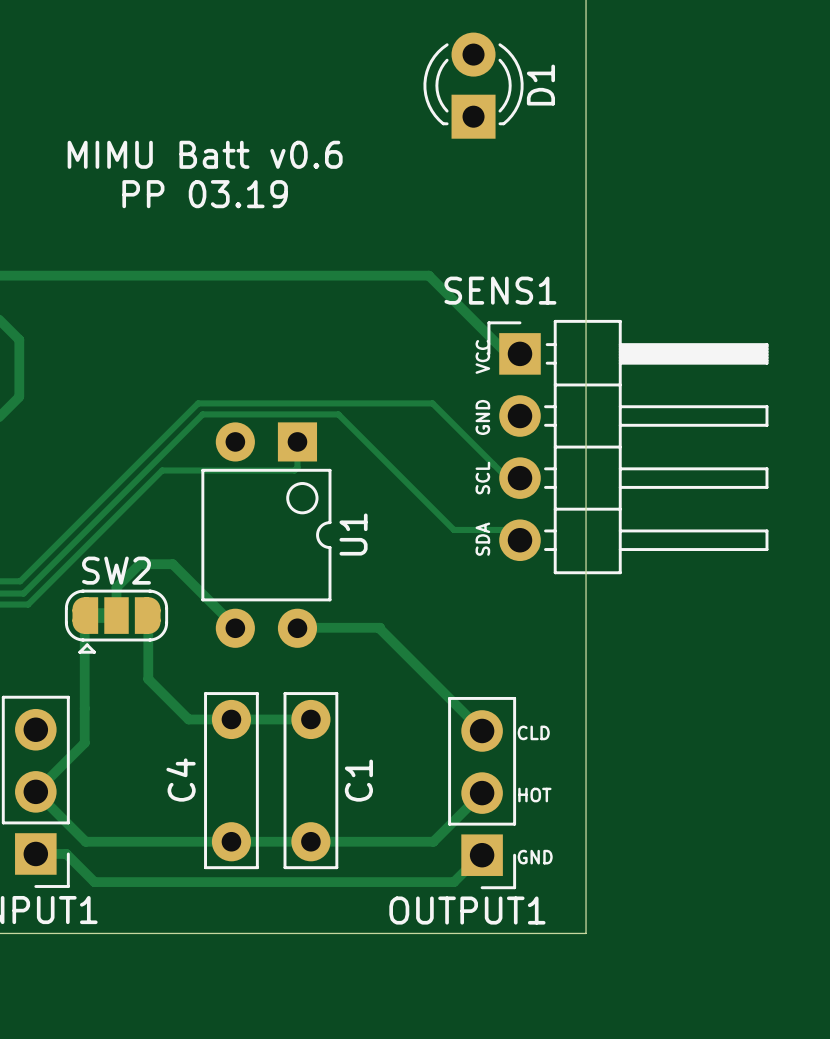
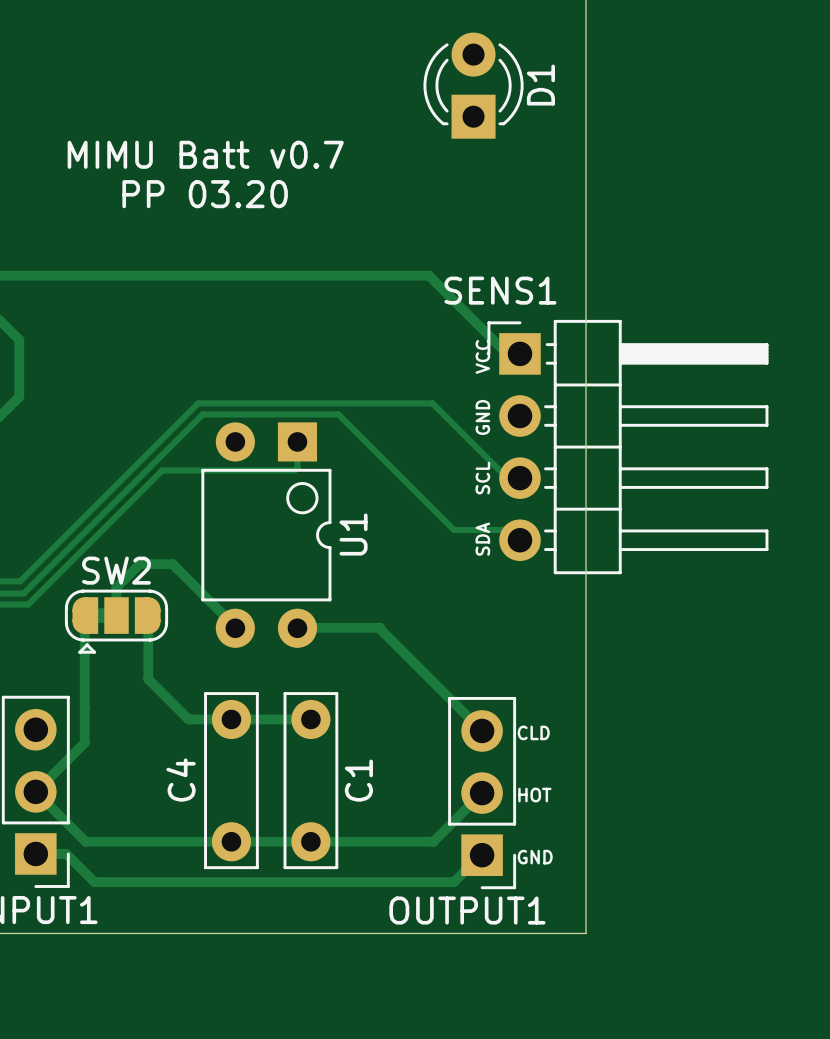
text: MIMU Batt v0.6 (205, 154) -> MIMU Batt v0.7 (205, 154)
text: PP 03.19 (205, 194) -> PP 03.20 (205, 194)

